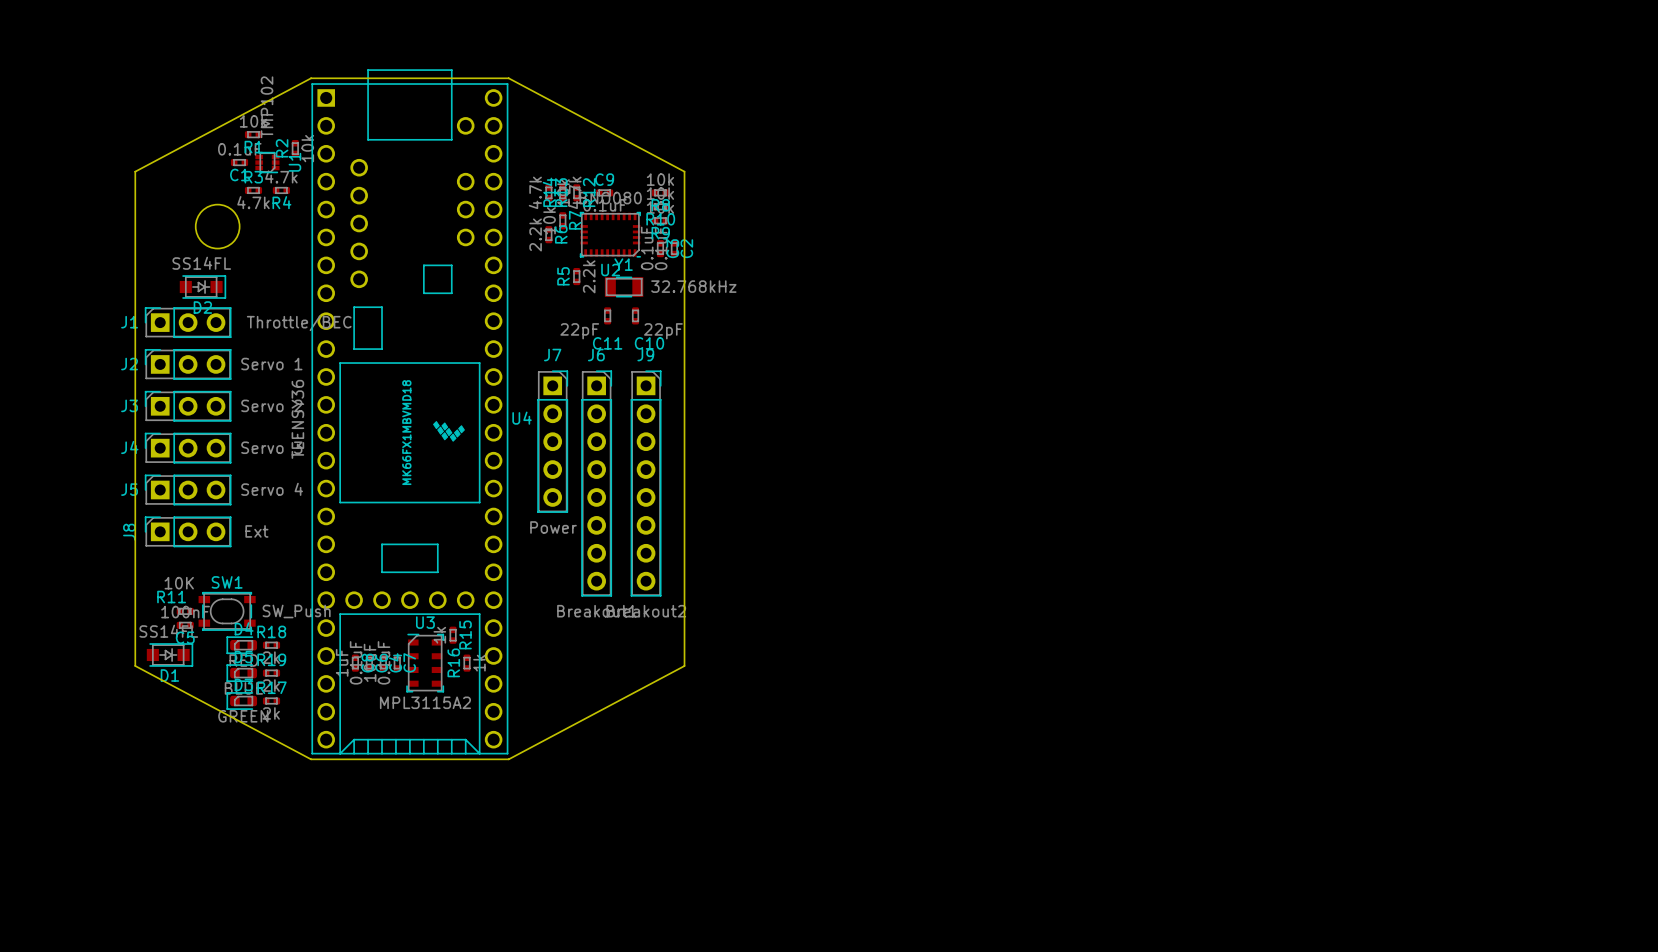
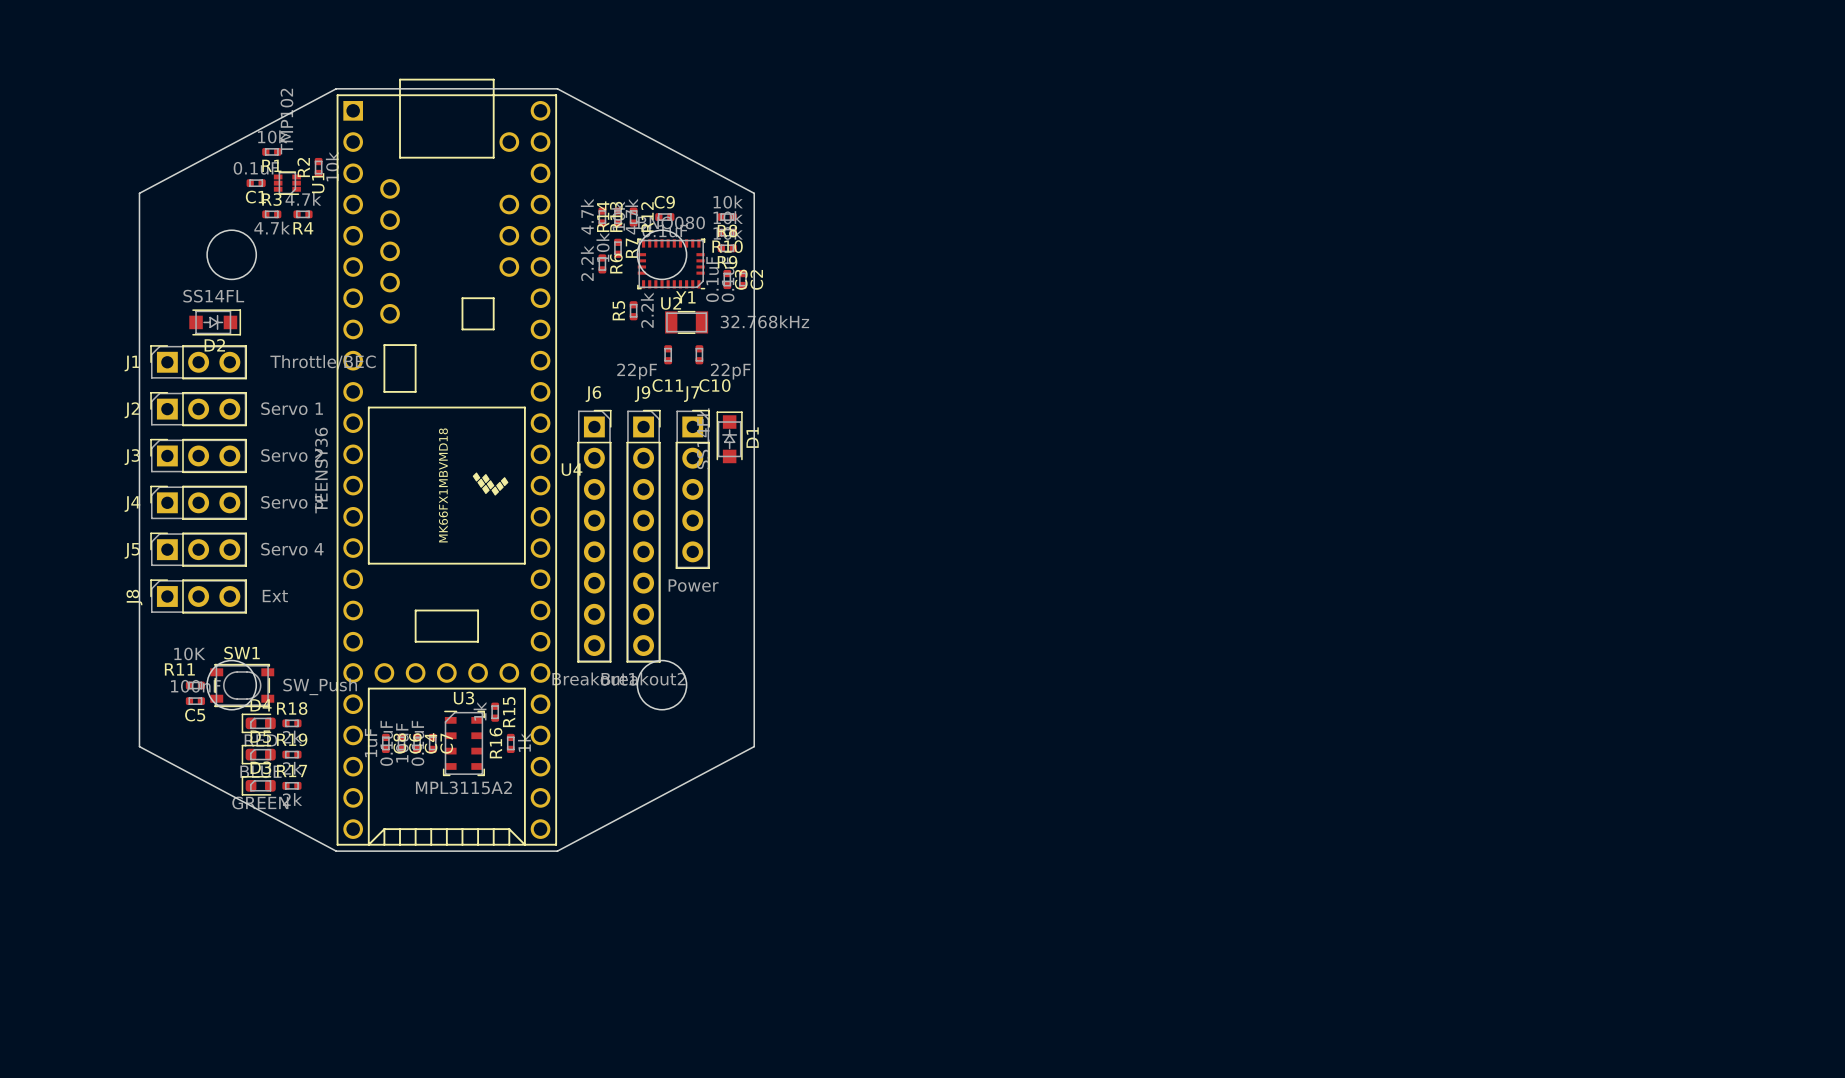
round board edge: none -> [636, 229, 688, 281]
J7 position: (552, 441) -> (692, 489)
J6 position: (596, 483) -> (594, 536)
J9 position: (646, 483) -> (643, 536)
round board edge: none -> [206, 659, 257, 711]
round board edge: none -> [636, 659, 688, 711]
D1 rotation: 0° (169, 654) -> 90° counterclockwise (729, 437)
D1 position: (169, 654) -> (729, 437)

